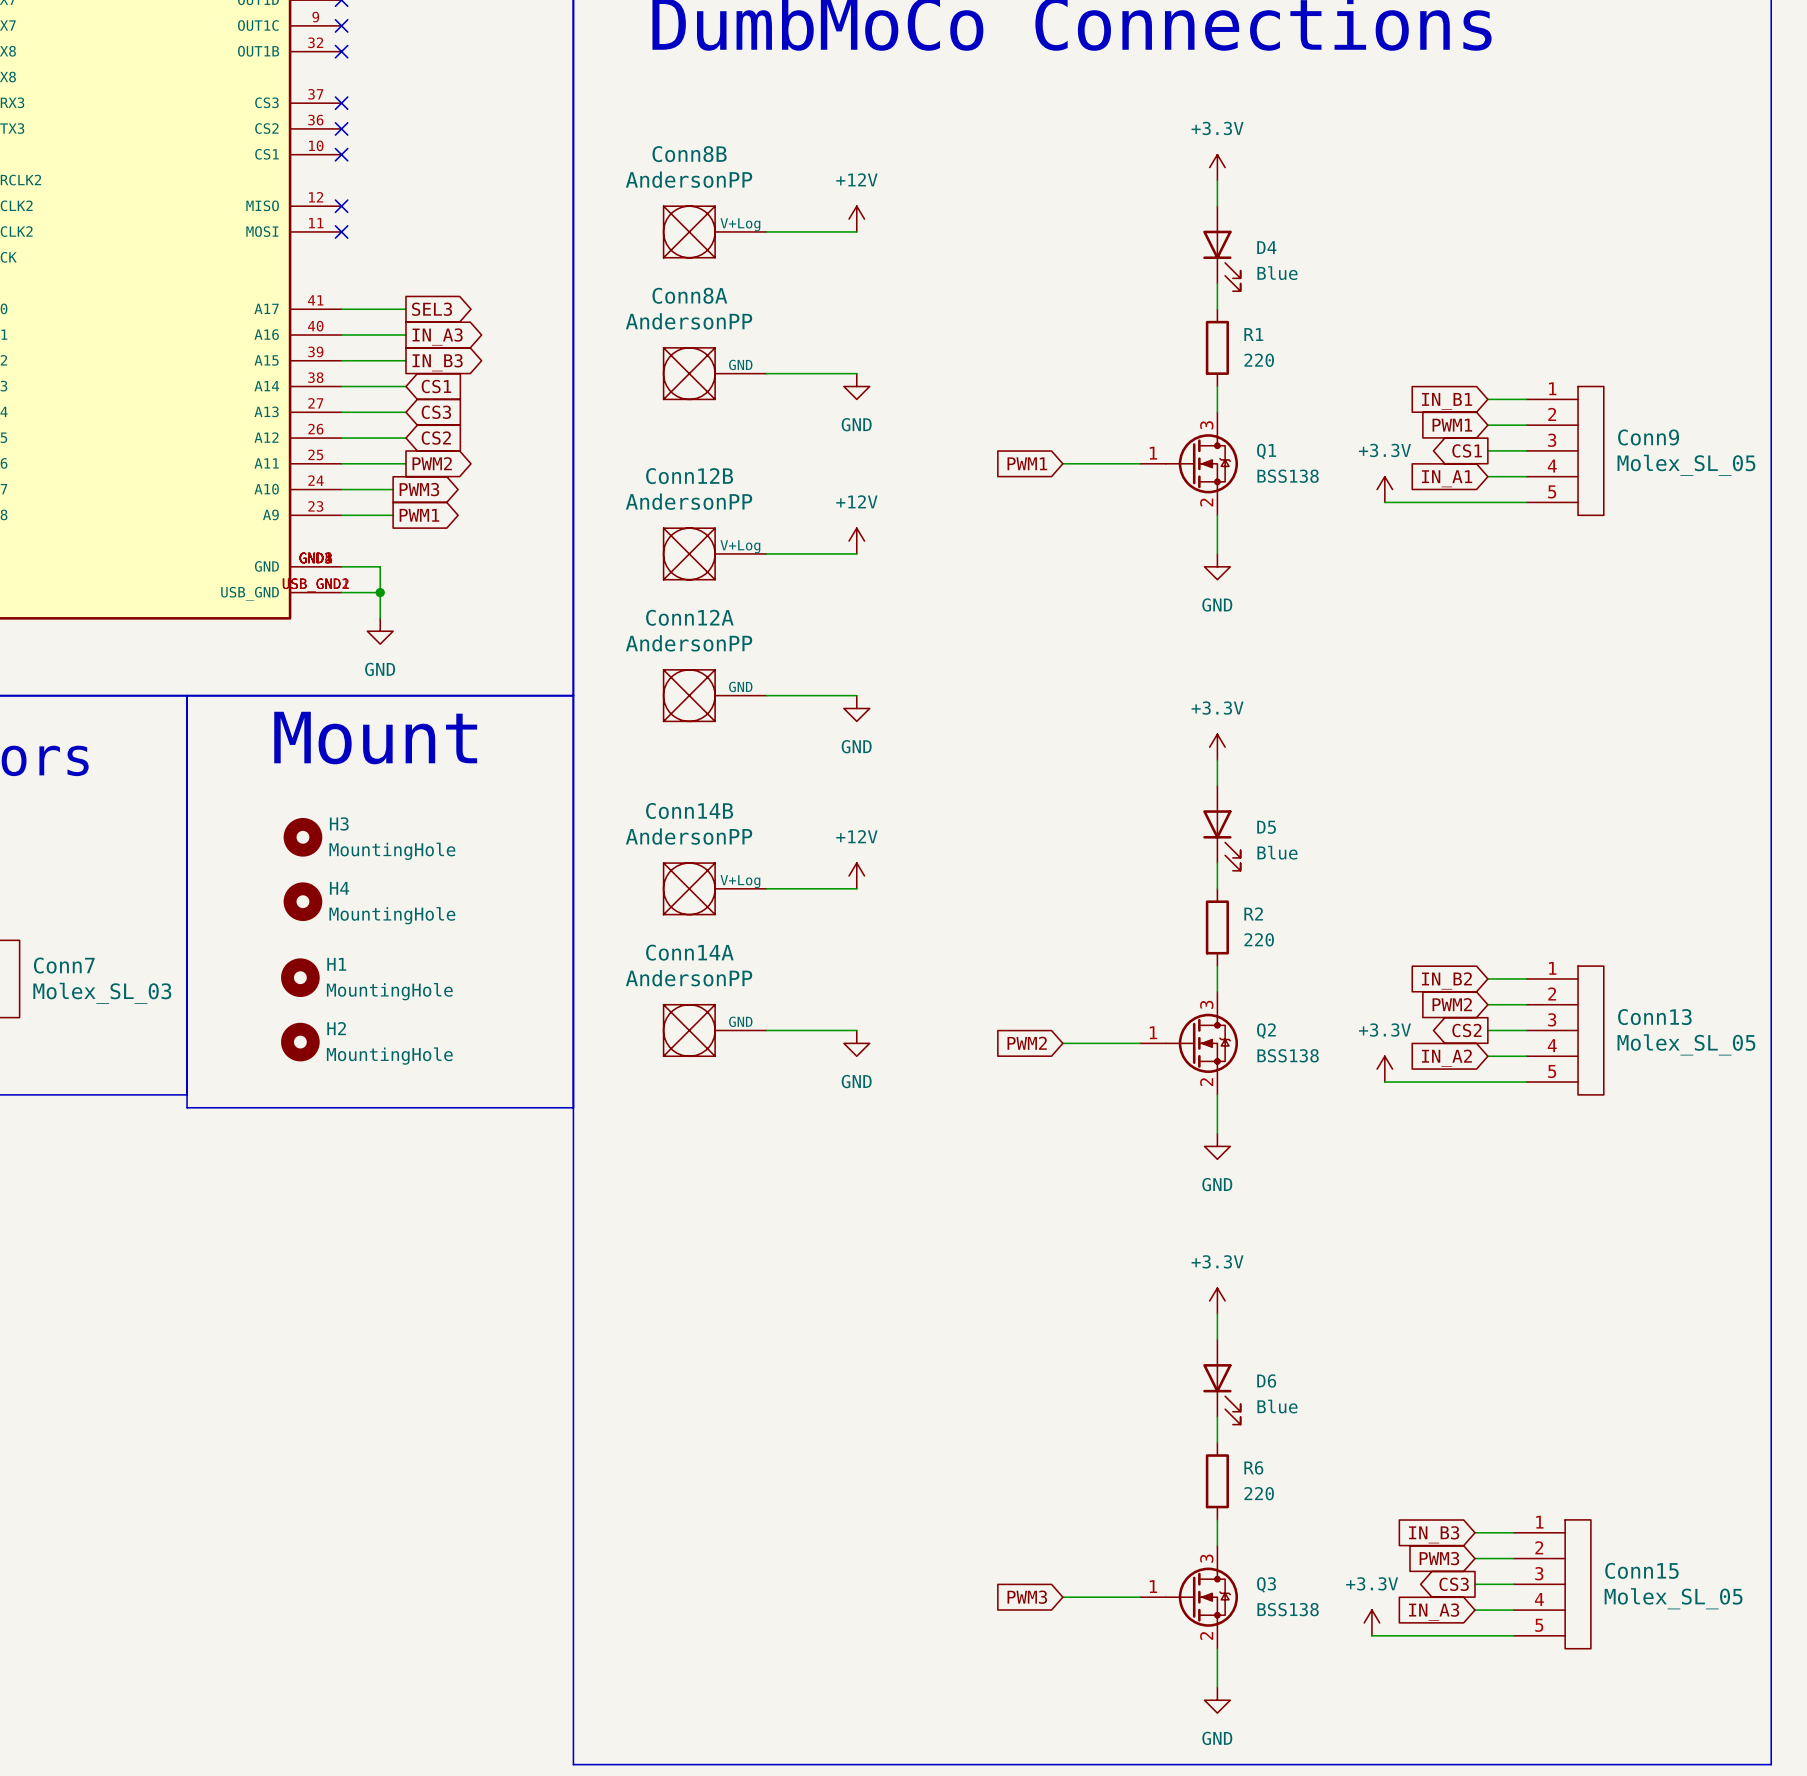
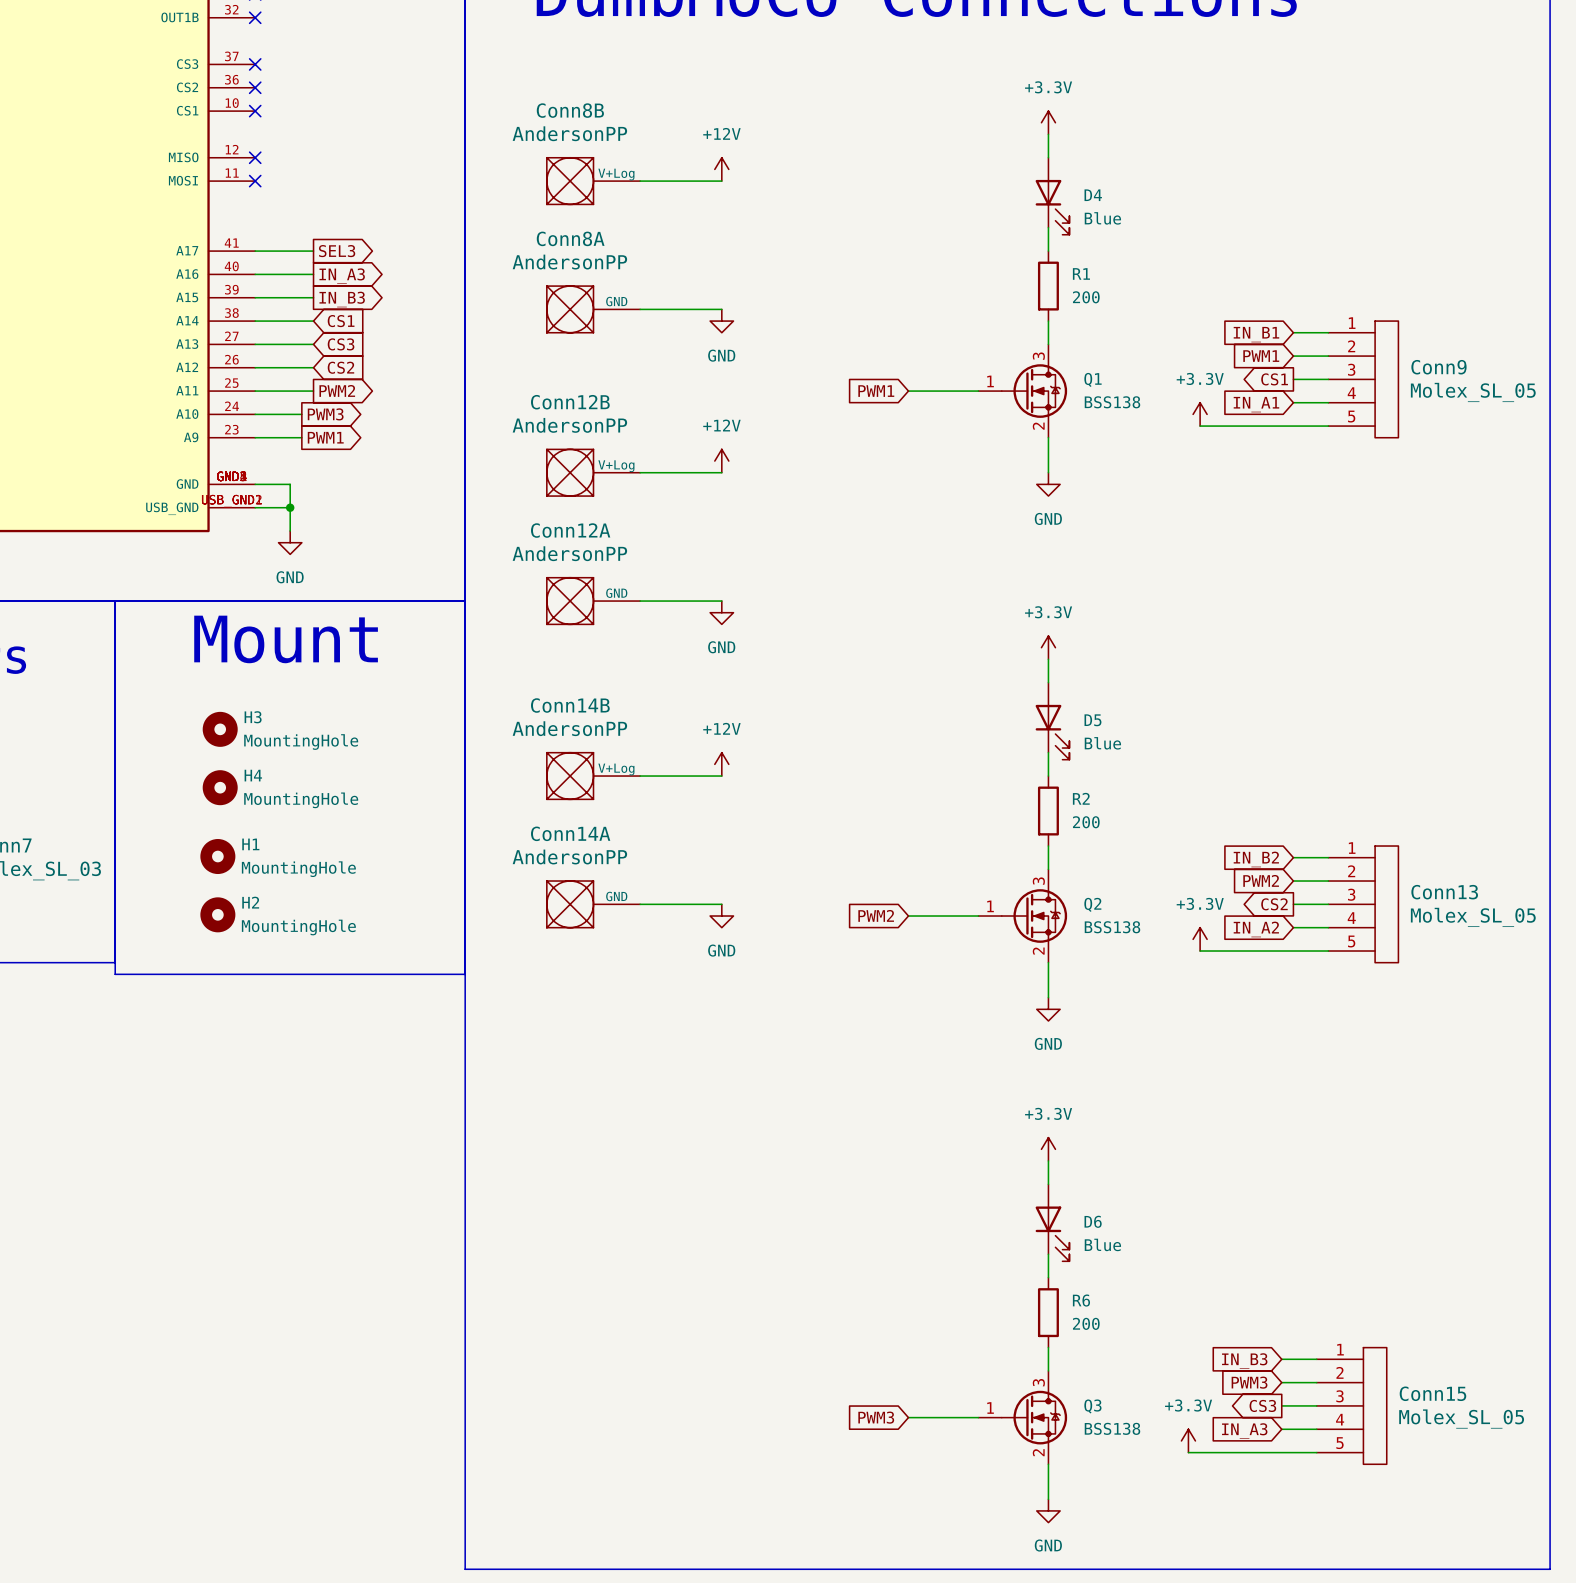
R1 value: 220 (1259, 360) -> 200 (1086, 297)
R2 value: 220 (1259, 939) -> 200 (1086, 822)
R6 value: 220 (1259, 1493) -> 200 (1086, 1323)

